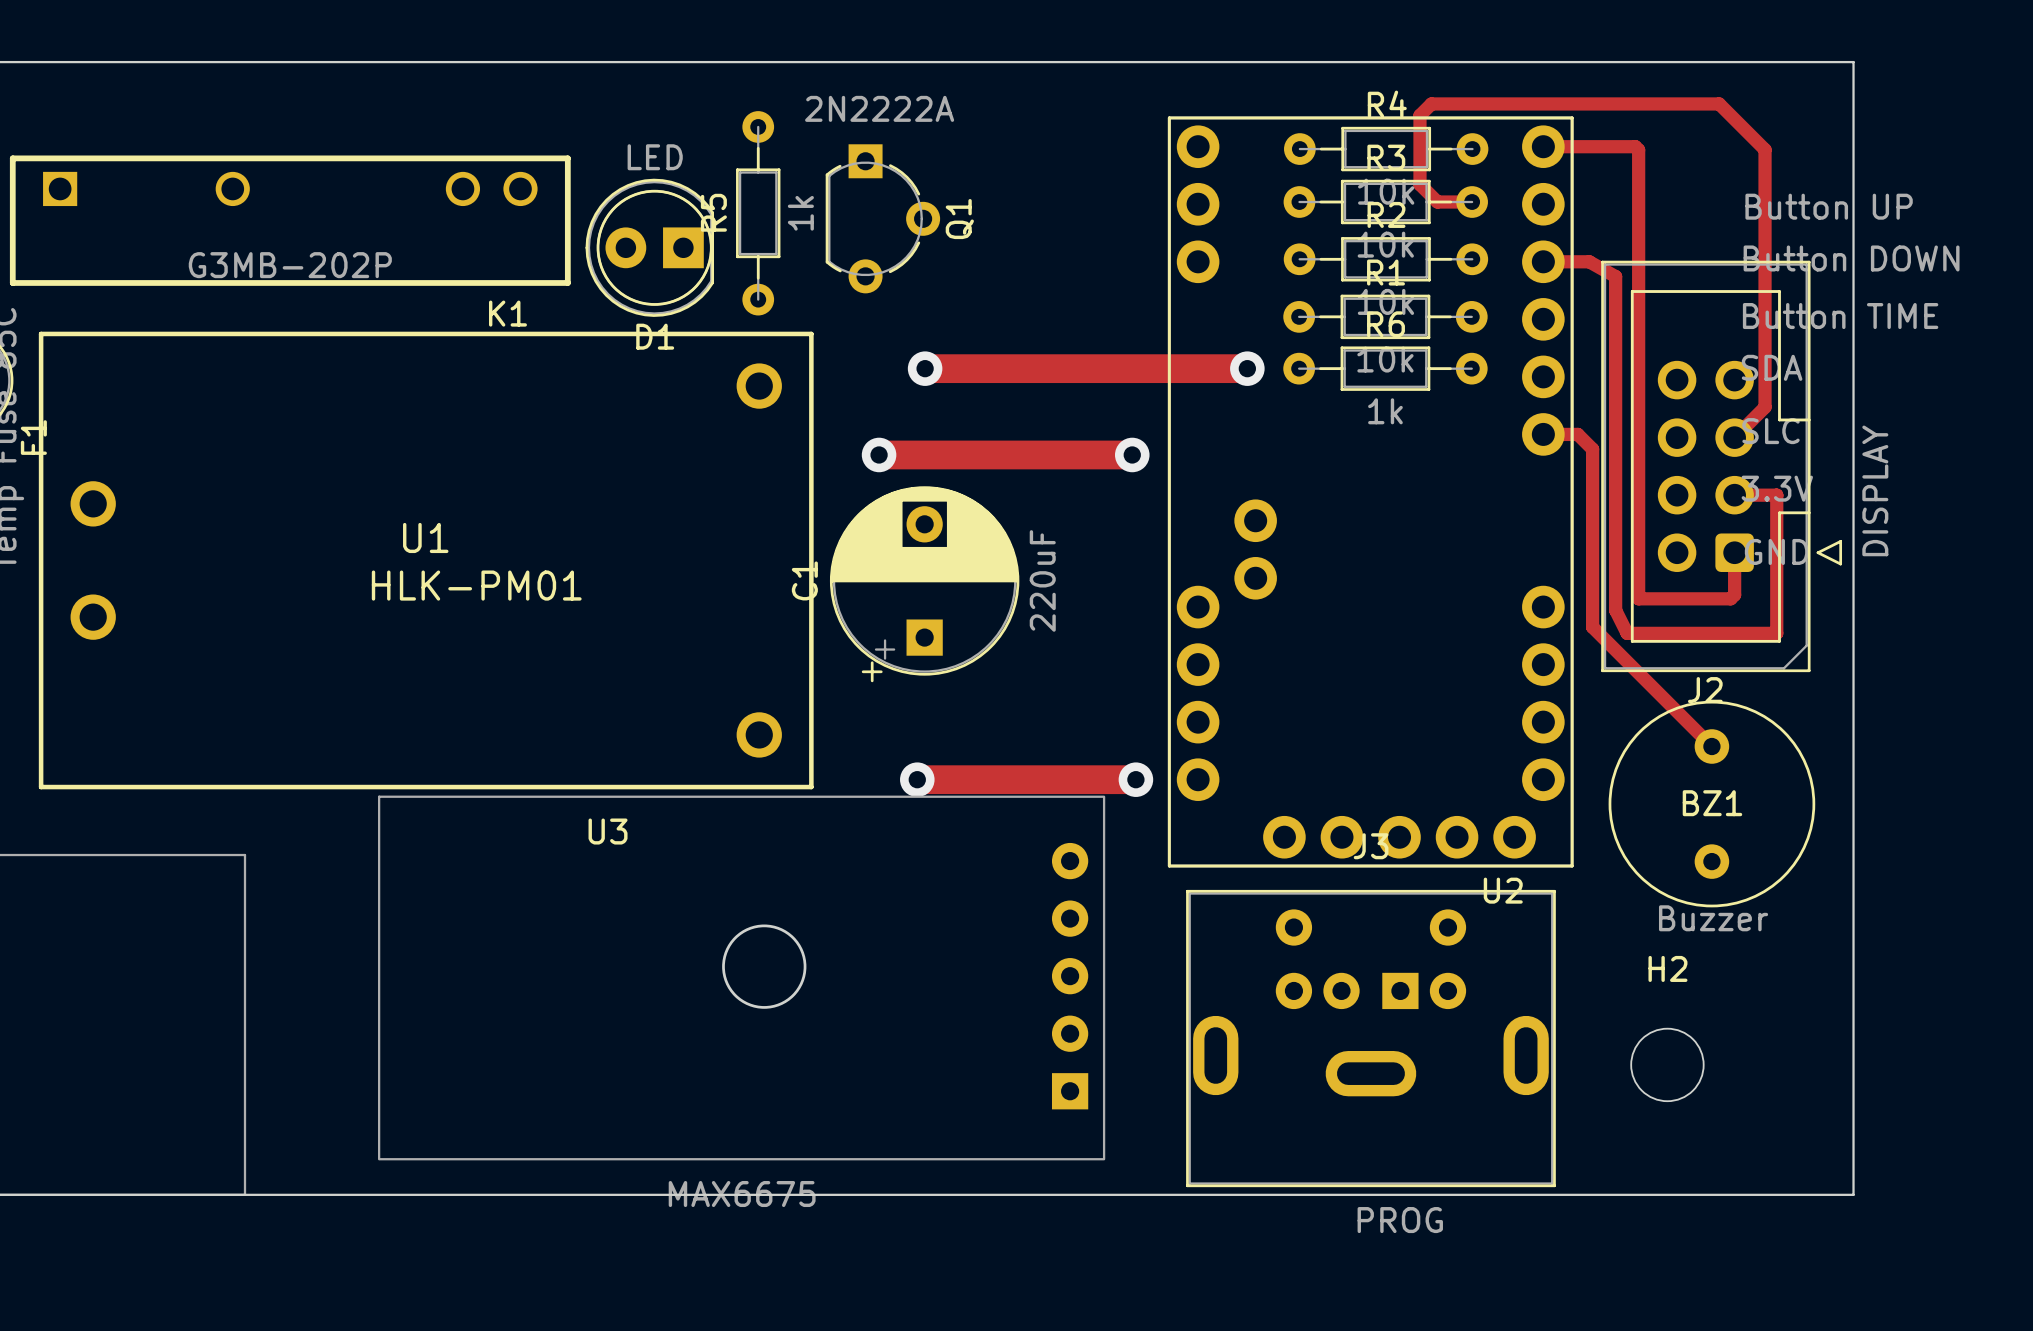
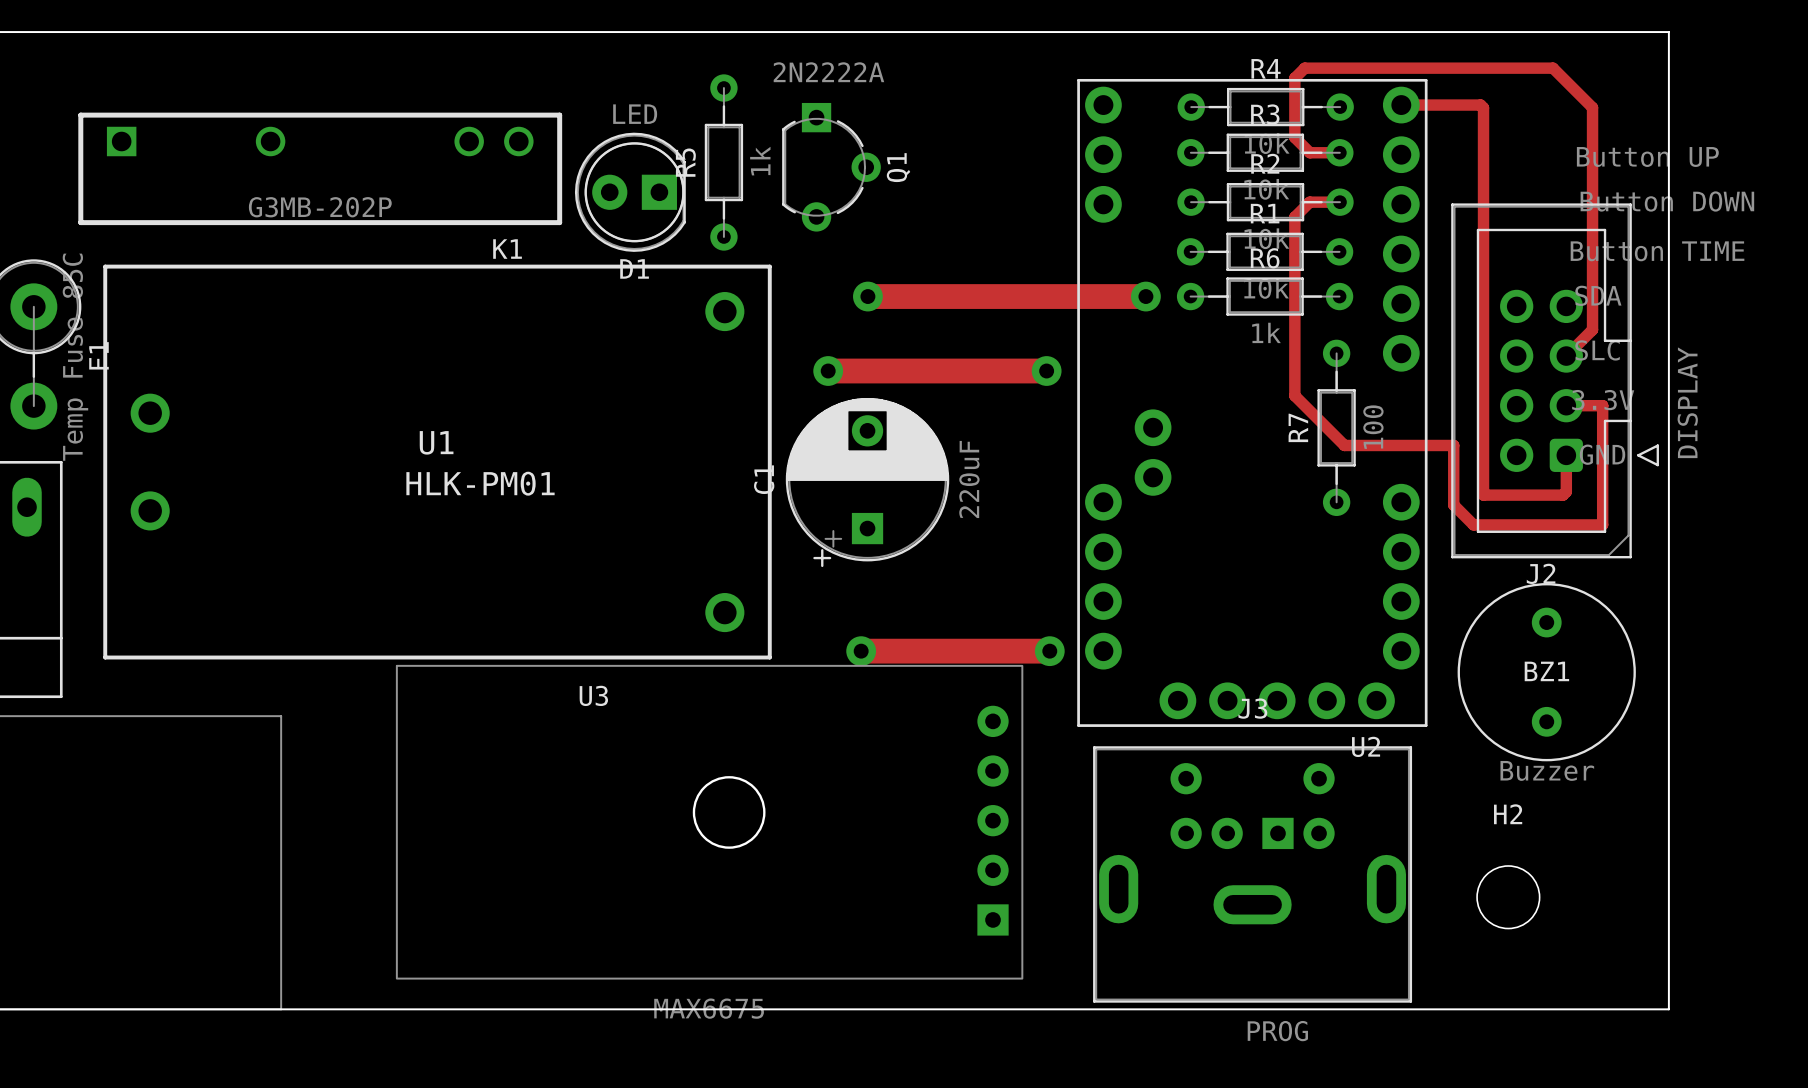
track: (1543, 261) (1589, 261) (1615, 276) (1615, 610) (1627, 633) -> (1339, 202) (1309, 202) (1294, 217) (1294, 395) (1344, 445) (1453, 445) (1453, 505) (1473, 524)
track: (1543, 434) (1577, 434) (1592, 449) (1592, 627) (1711, 746) -> none
R7: none -> 100 (1336, 427)

